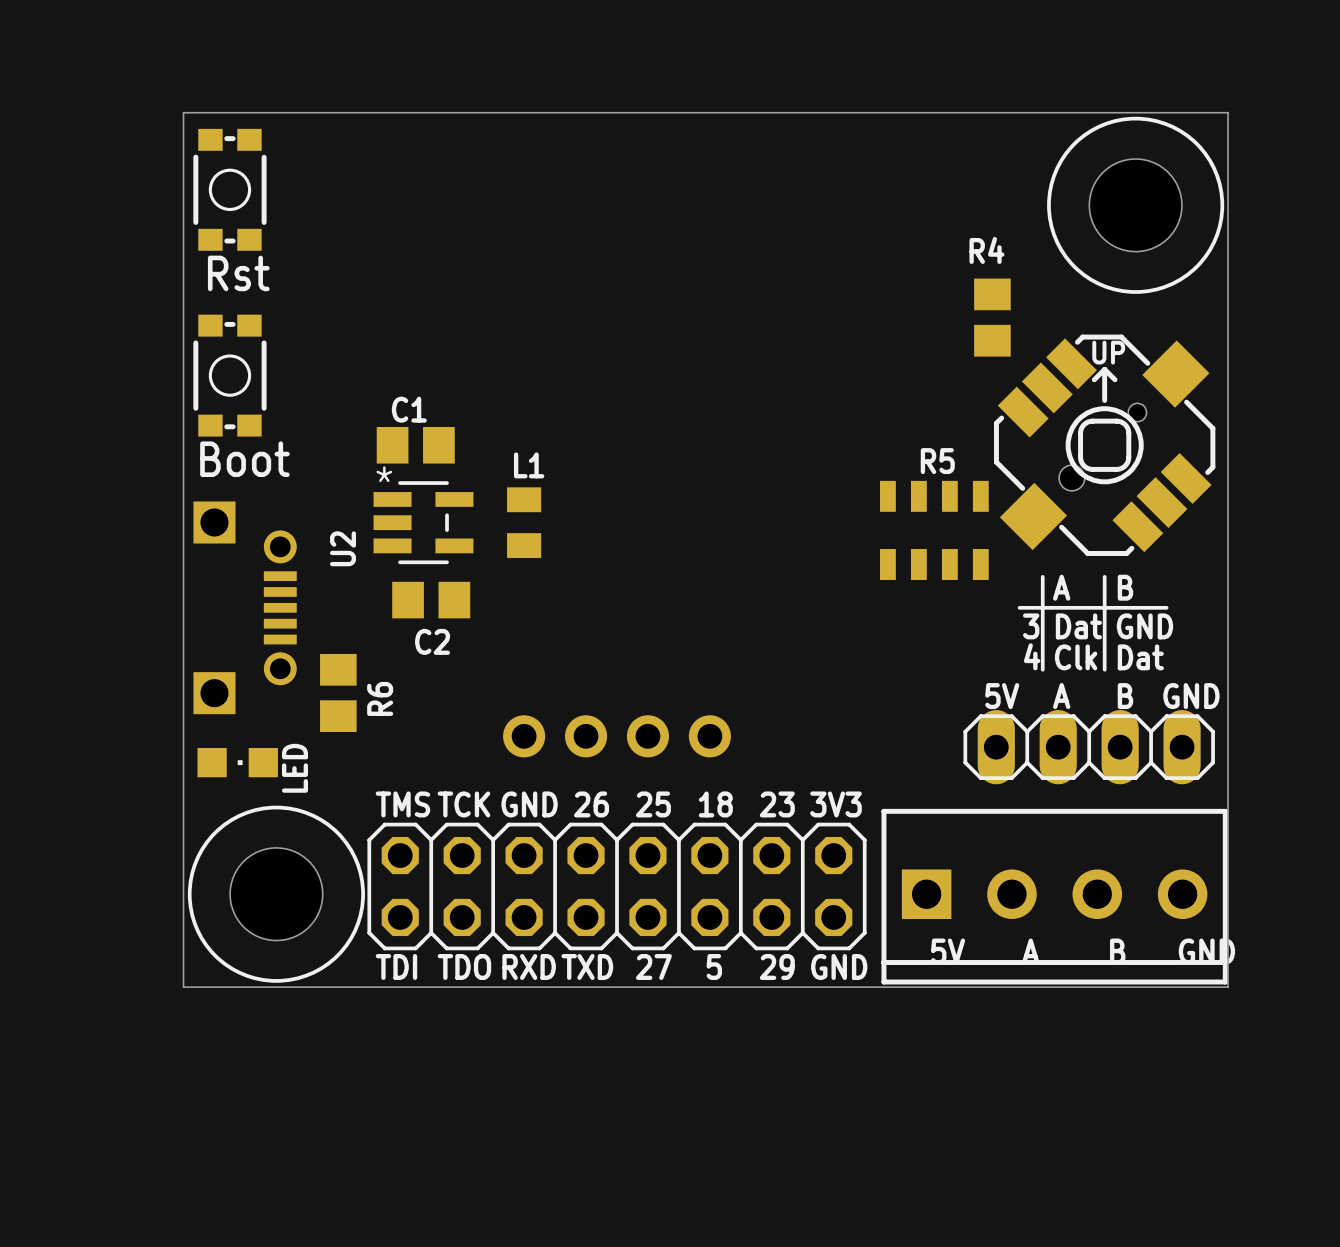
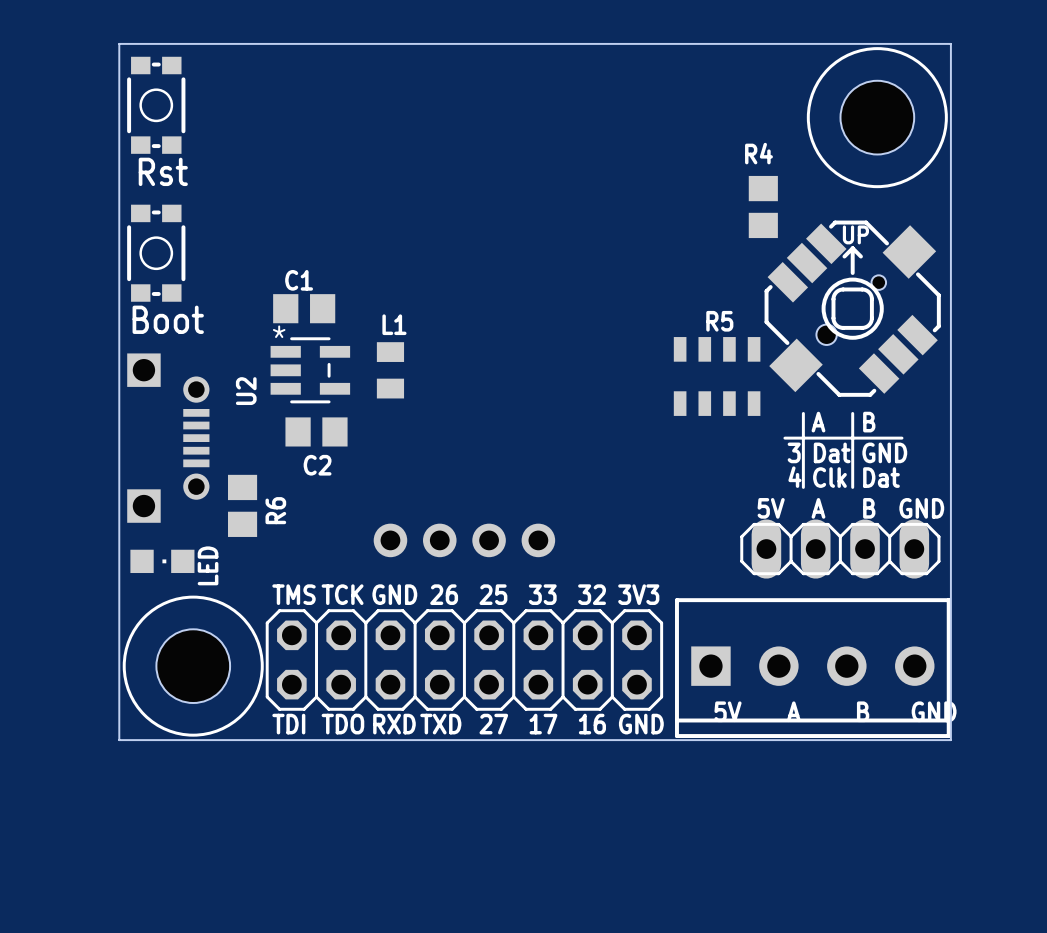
text: 18 (715, 804) -> 33 (542, 594)
text: 23 (777, 804) -> 32 (592, 594)
text: 5 (714, 967) -> 17 (543, 724)
text: 29 (777, 967) -> 16 (592, 724)

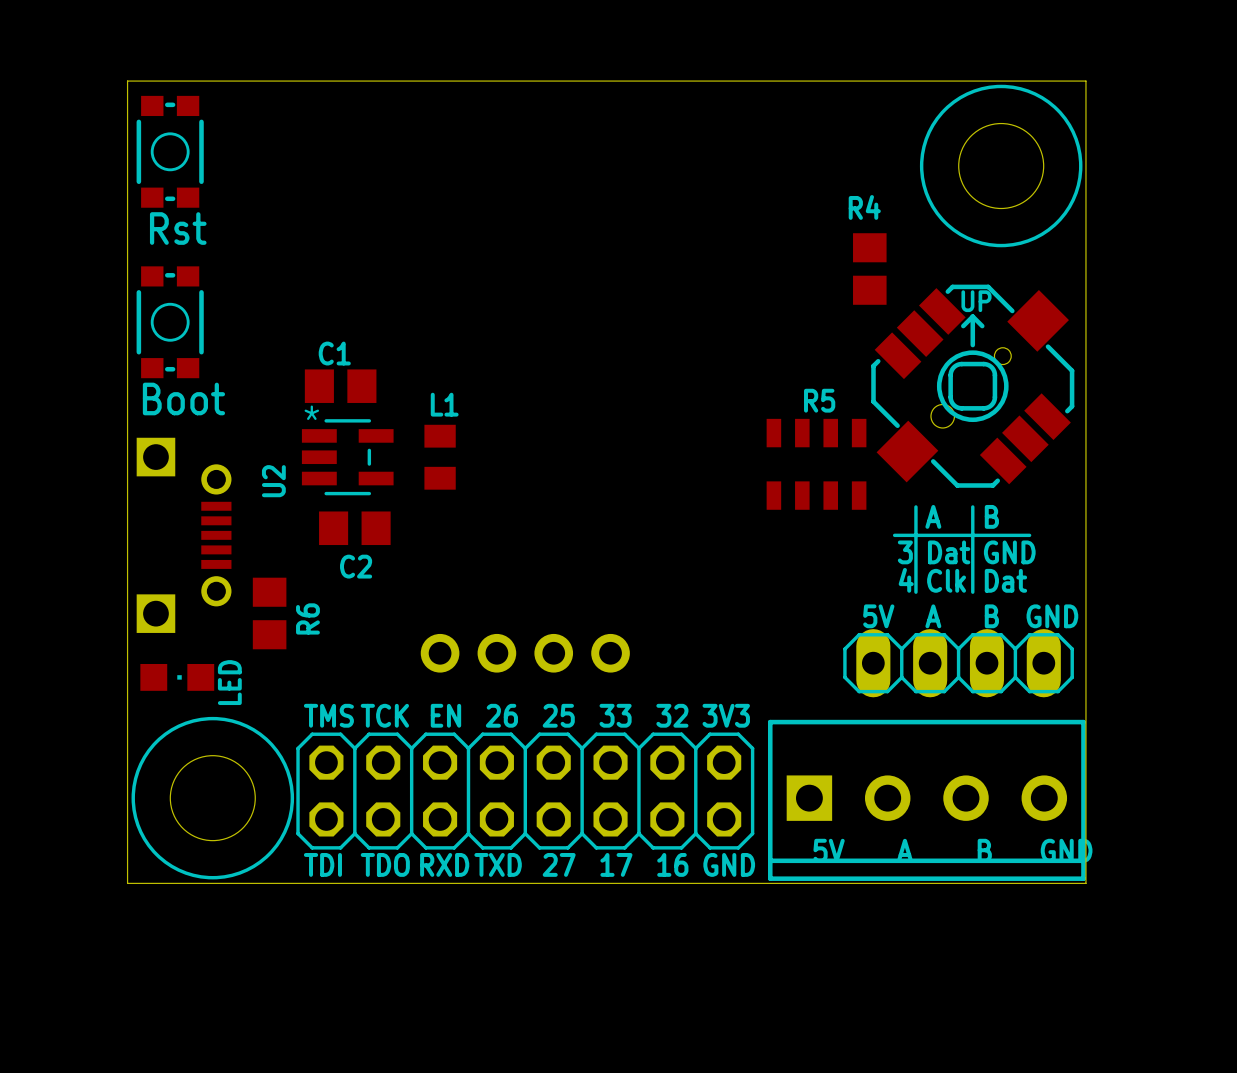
text: GND (394, 594) -> EN (445, 715)

